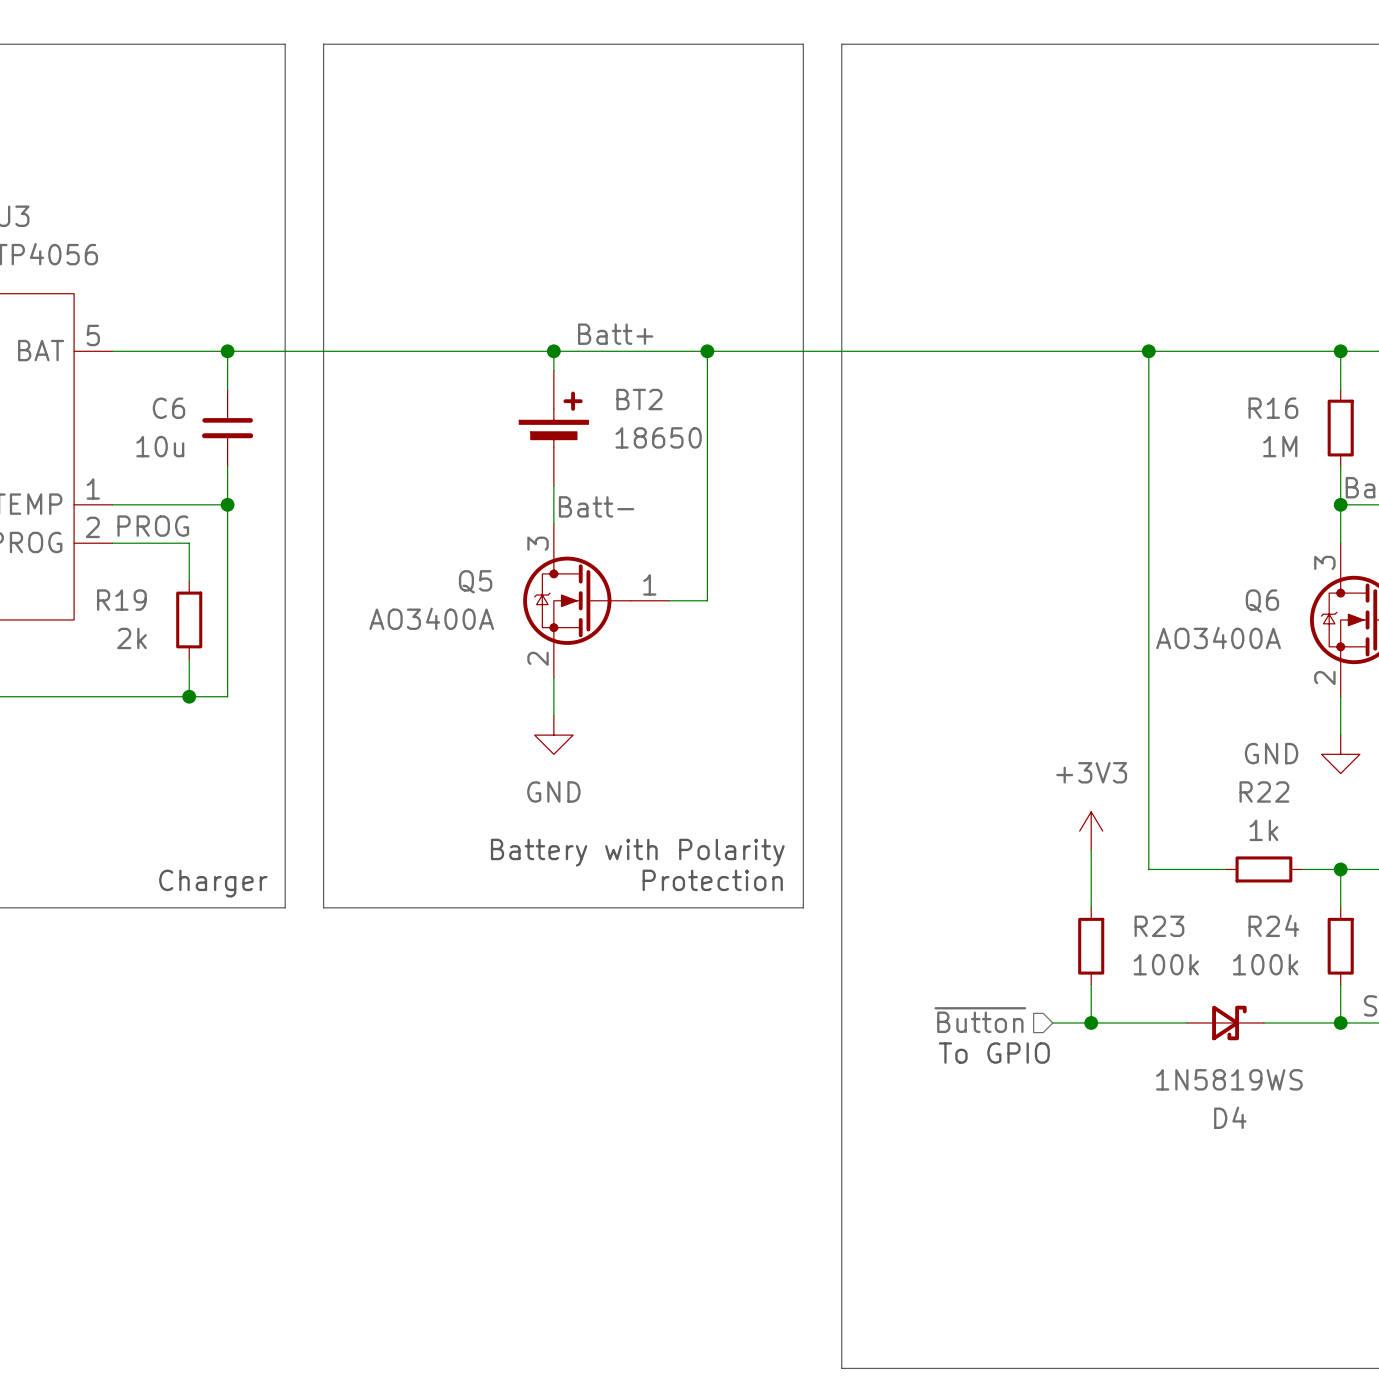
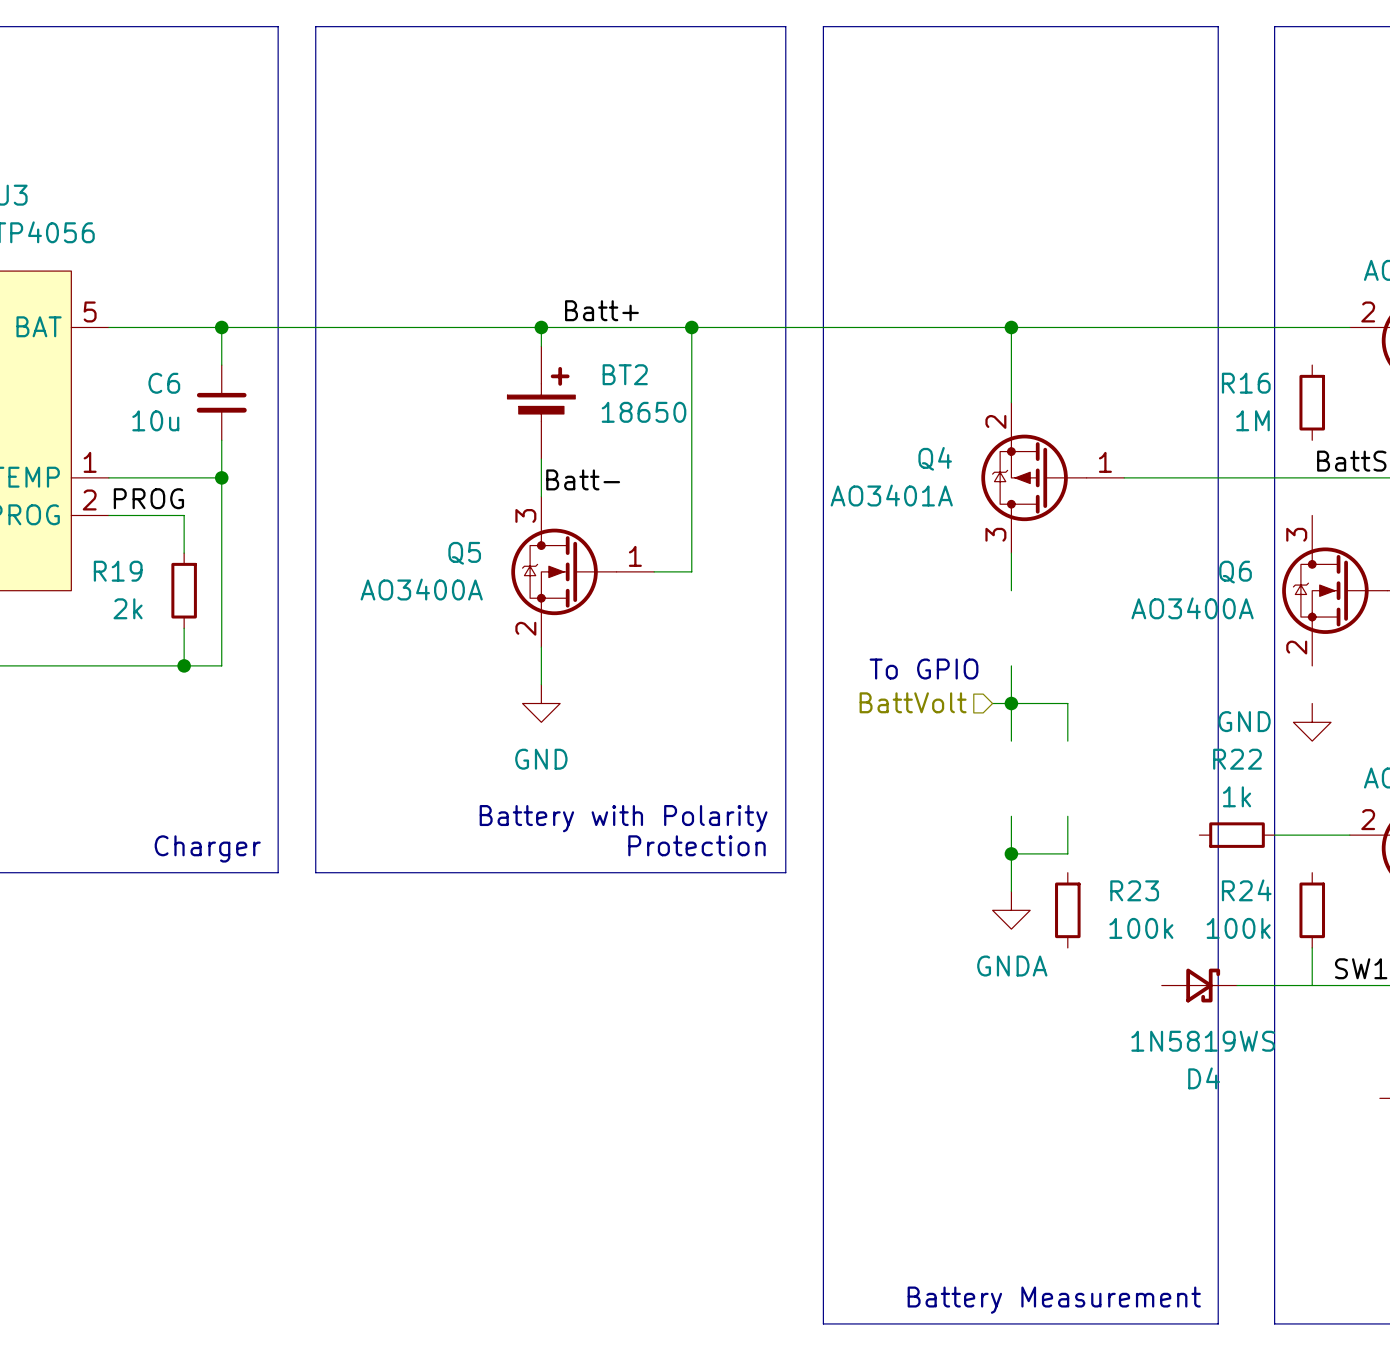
line: (1244, 44) (1302, 44) -> (1218, 26) (1218, 1323)
junction: none -> (1011, 327)
wire: (1148, 351) (1148, 869) (1225, 869) -> none
junction: (1148, 351) -> none
wire: (1340, 351) (1340, 389) -> none
junction: (1340, 351) -> none
wire: (1340, 466) (1340, 543) -> (1011, 327) (1011, 402)
Q4: none -> AO3401A (1052, 477)
wire: none -> (1124, 477) (1312, 477)
junction: (1340, 504) -> none
wire: none -> (1011, 665) (1011, 741)
wire: (1340, 696) (1340, 735) -> (1011, 553) (1011, 590)
hierarchical label: none -> BattVolt (913, 702)
wire: none -> (992, 703) (1067, 703) (1067, 741)
junction: none -> (1011, 703)
power symbol: +3V3 (1091, 831) -> none
wire: none -> (1011, 816) (1011, 891)
wire: (1340, 869) (1340, 907) -> none
junction: (1340, 869) -> none
junction: none -> (1011, 853)
wire: (1091, 888) (1091, 907) -> (1067, 853) (1011, 853)
power symbol: none -> GNDA (1011, 910)
wire: (1091, 984) (1091, 1022) -> none
hierarchical label: ~{Button} (980, 1020) -> none
wire: (1052, 1022) (1187, 1022) -> none
junction: (1091, 1022) -> none
junction: (1340, 1022) -> none
text position: To GPIO (994, 1053) -> To GPIO (924, 669)
text: none -> Battery Measurement (1054, 1300)
line: (1244, 1368) (1302, 1368) -> (1274, 26) (1274, 1323)

